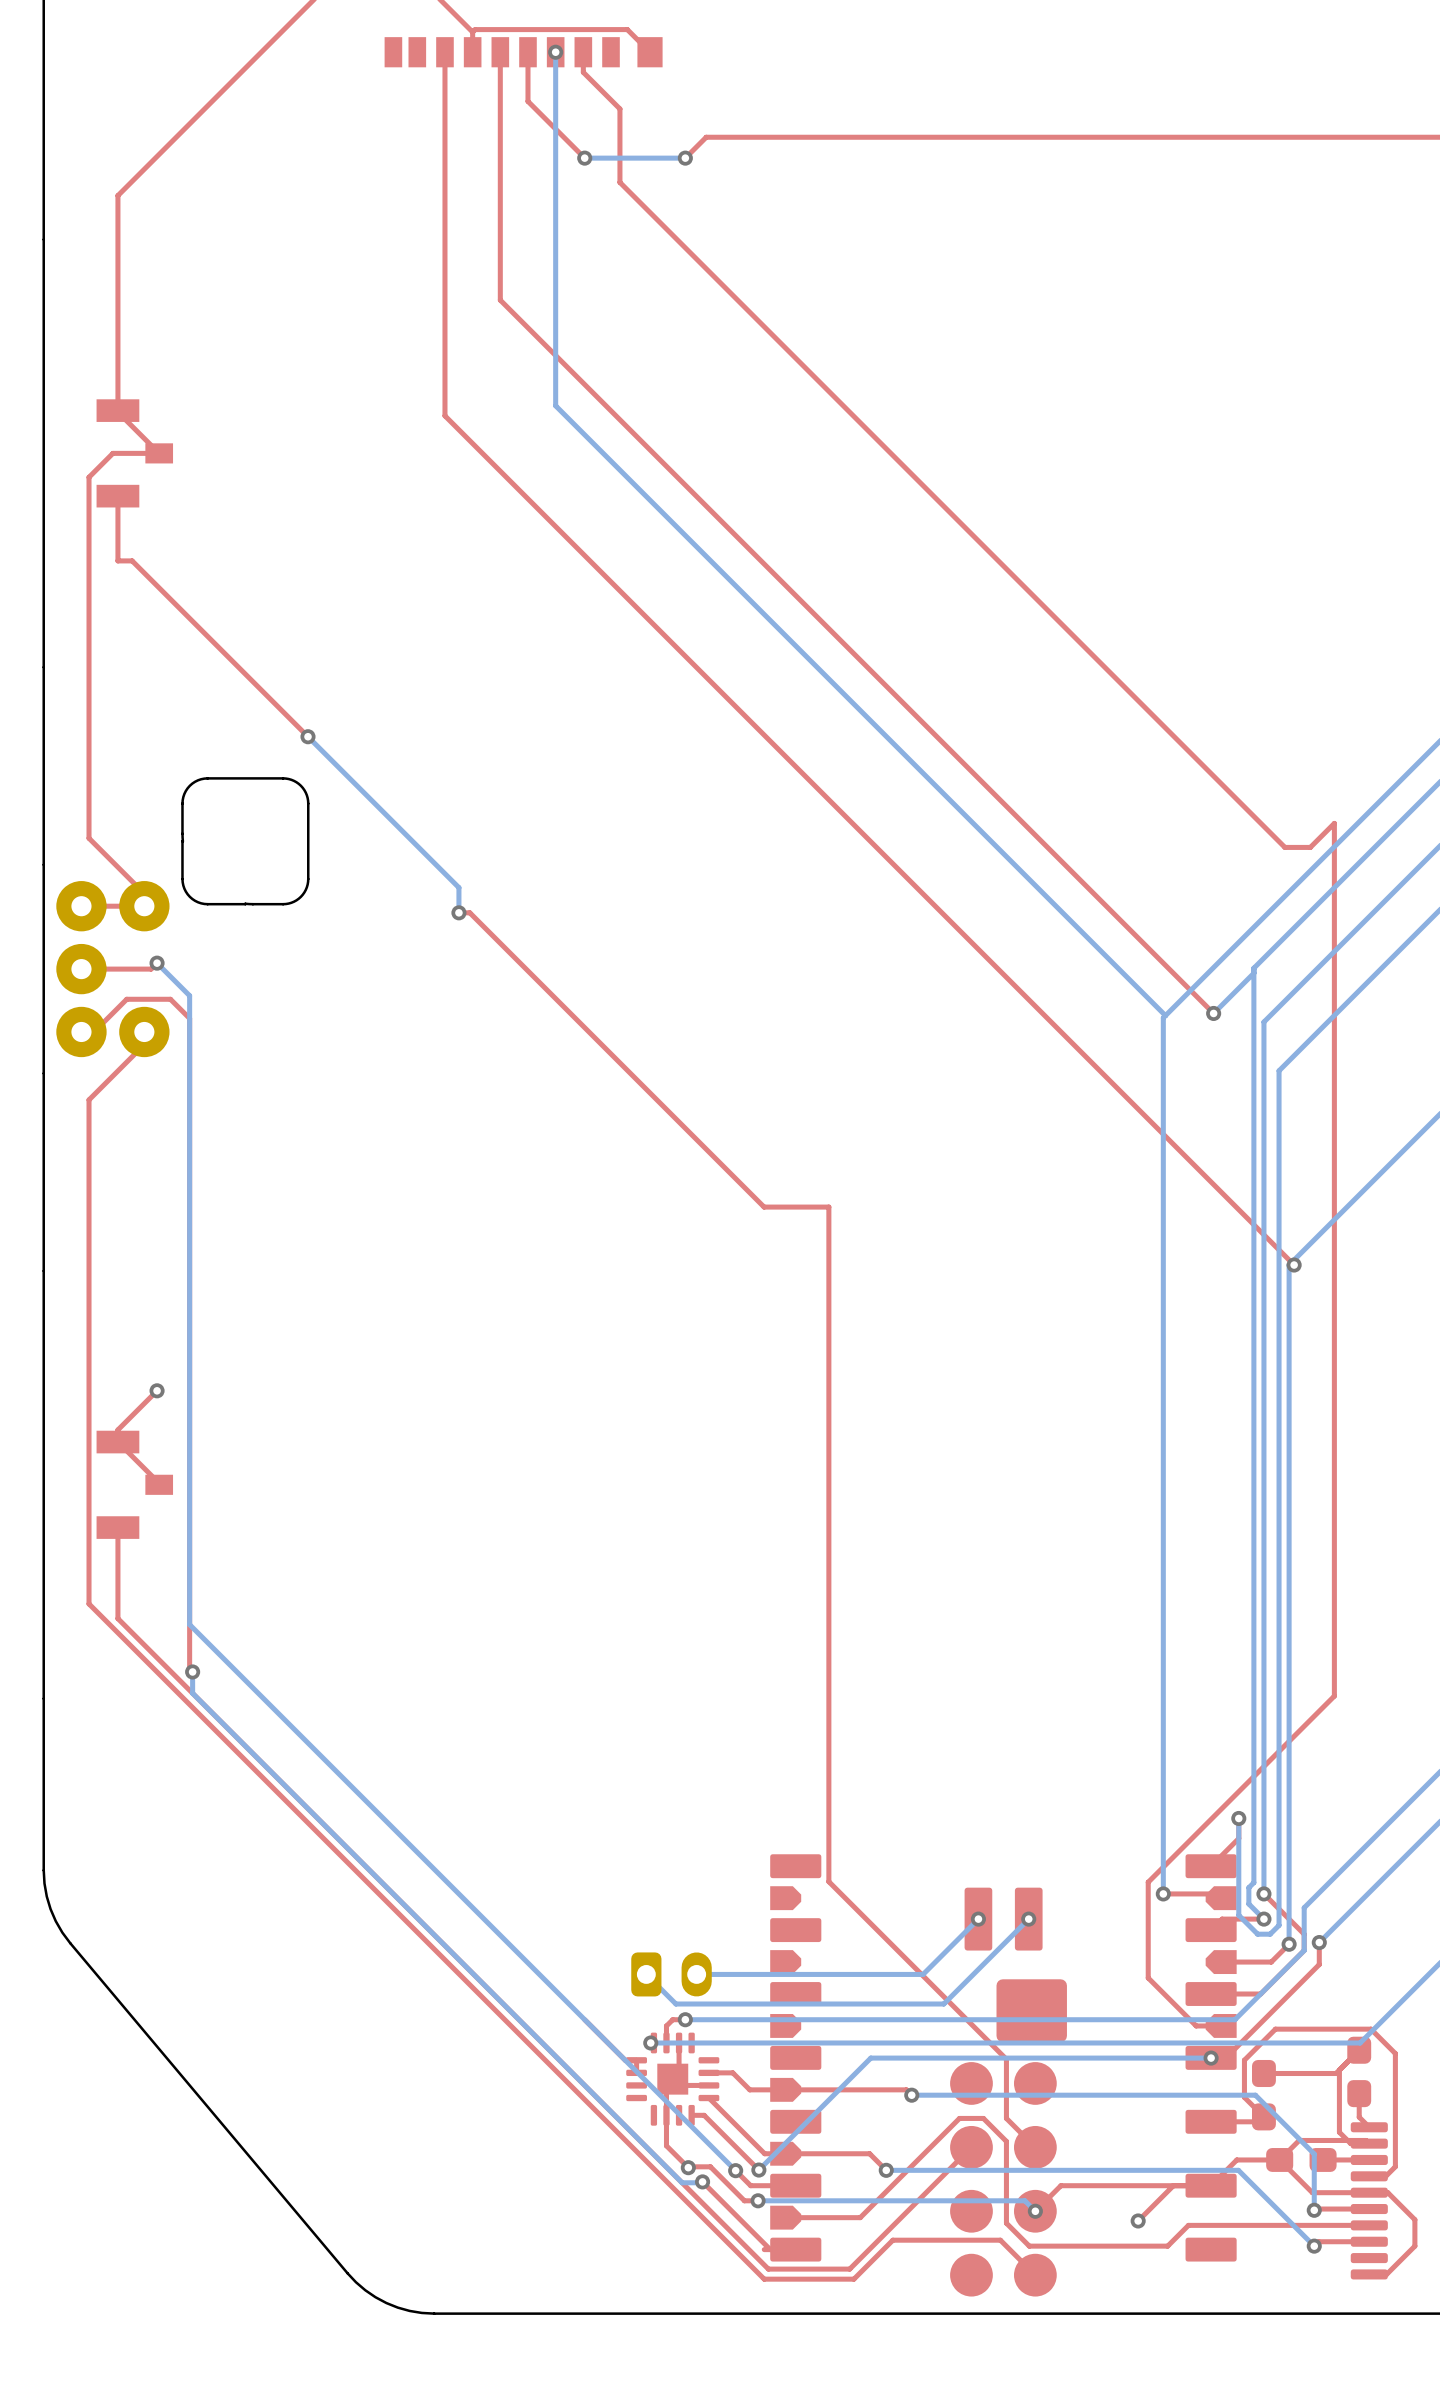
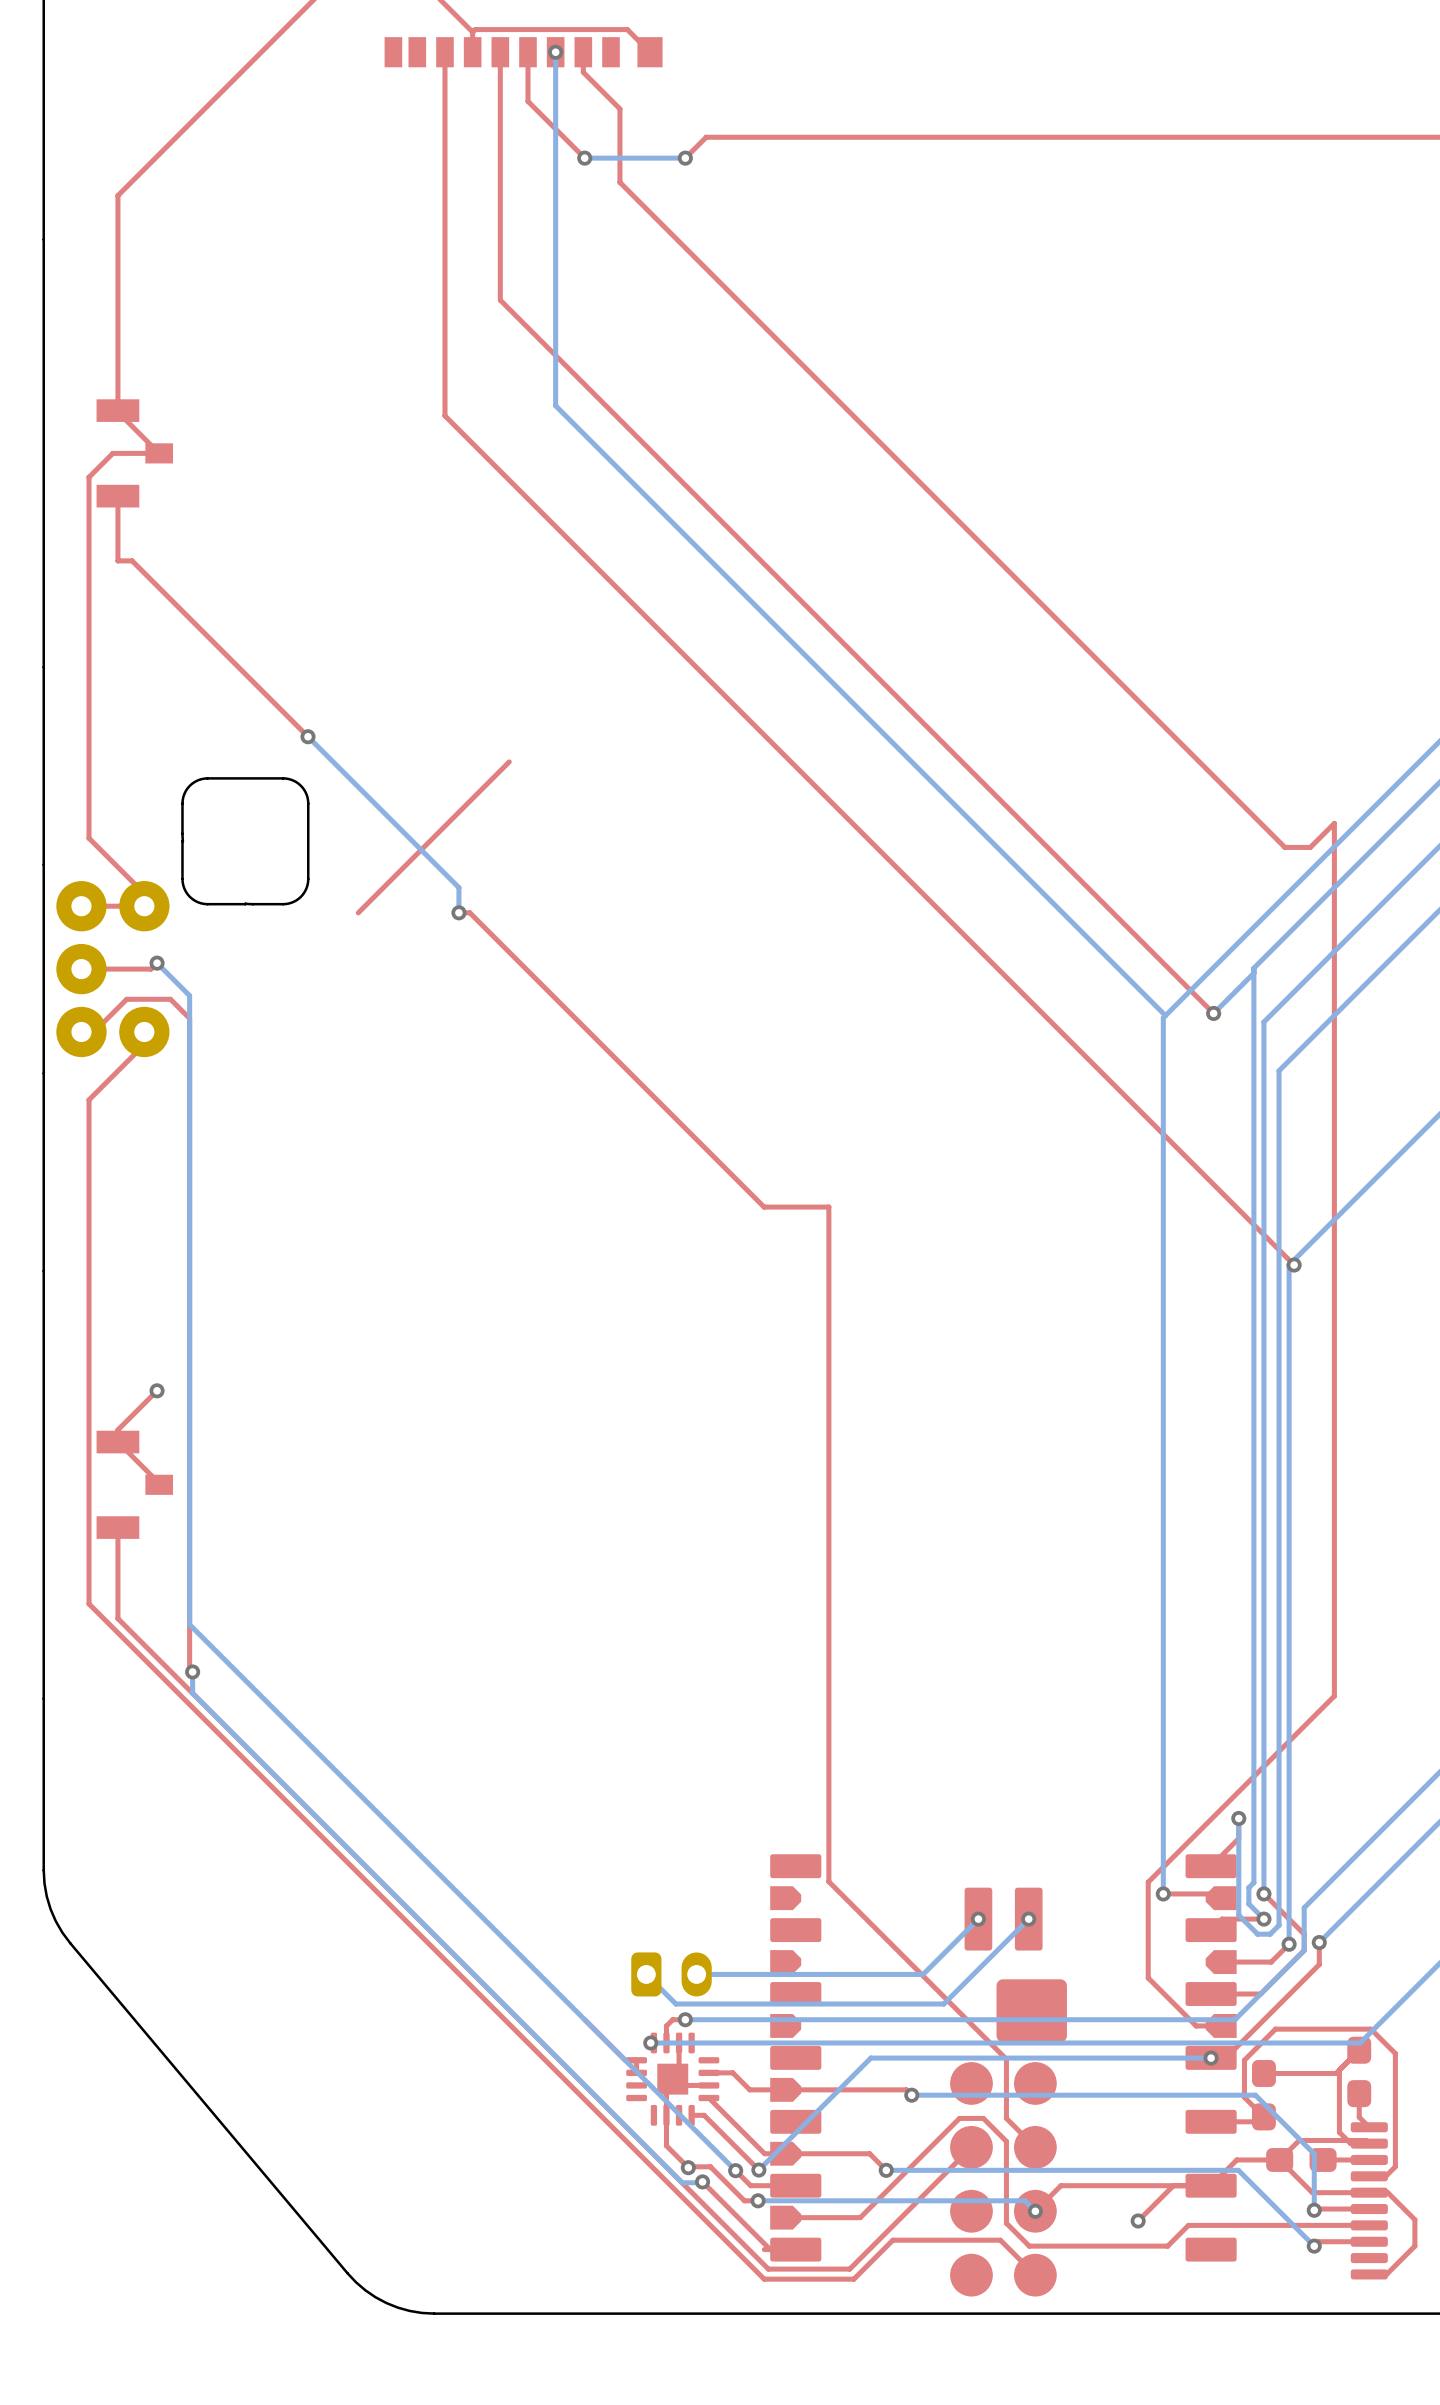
top track: none -> (509, 761) (358, 912)

